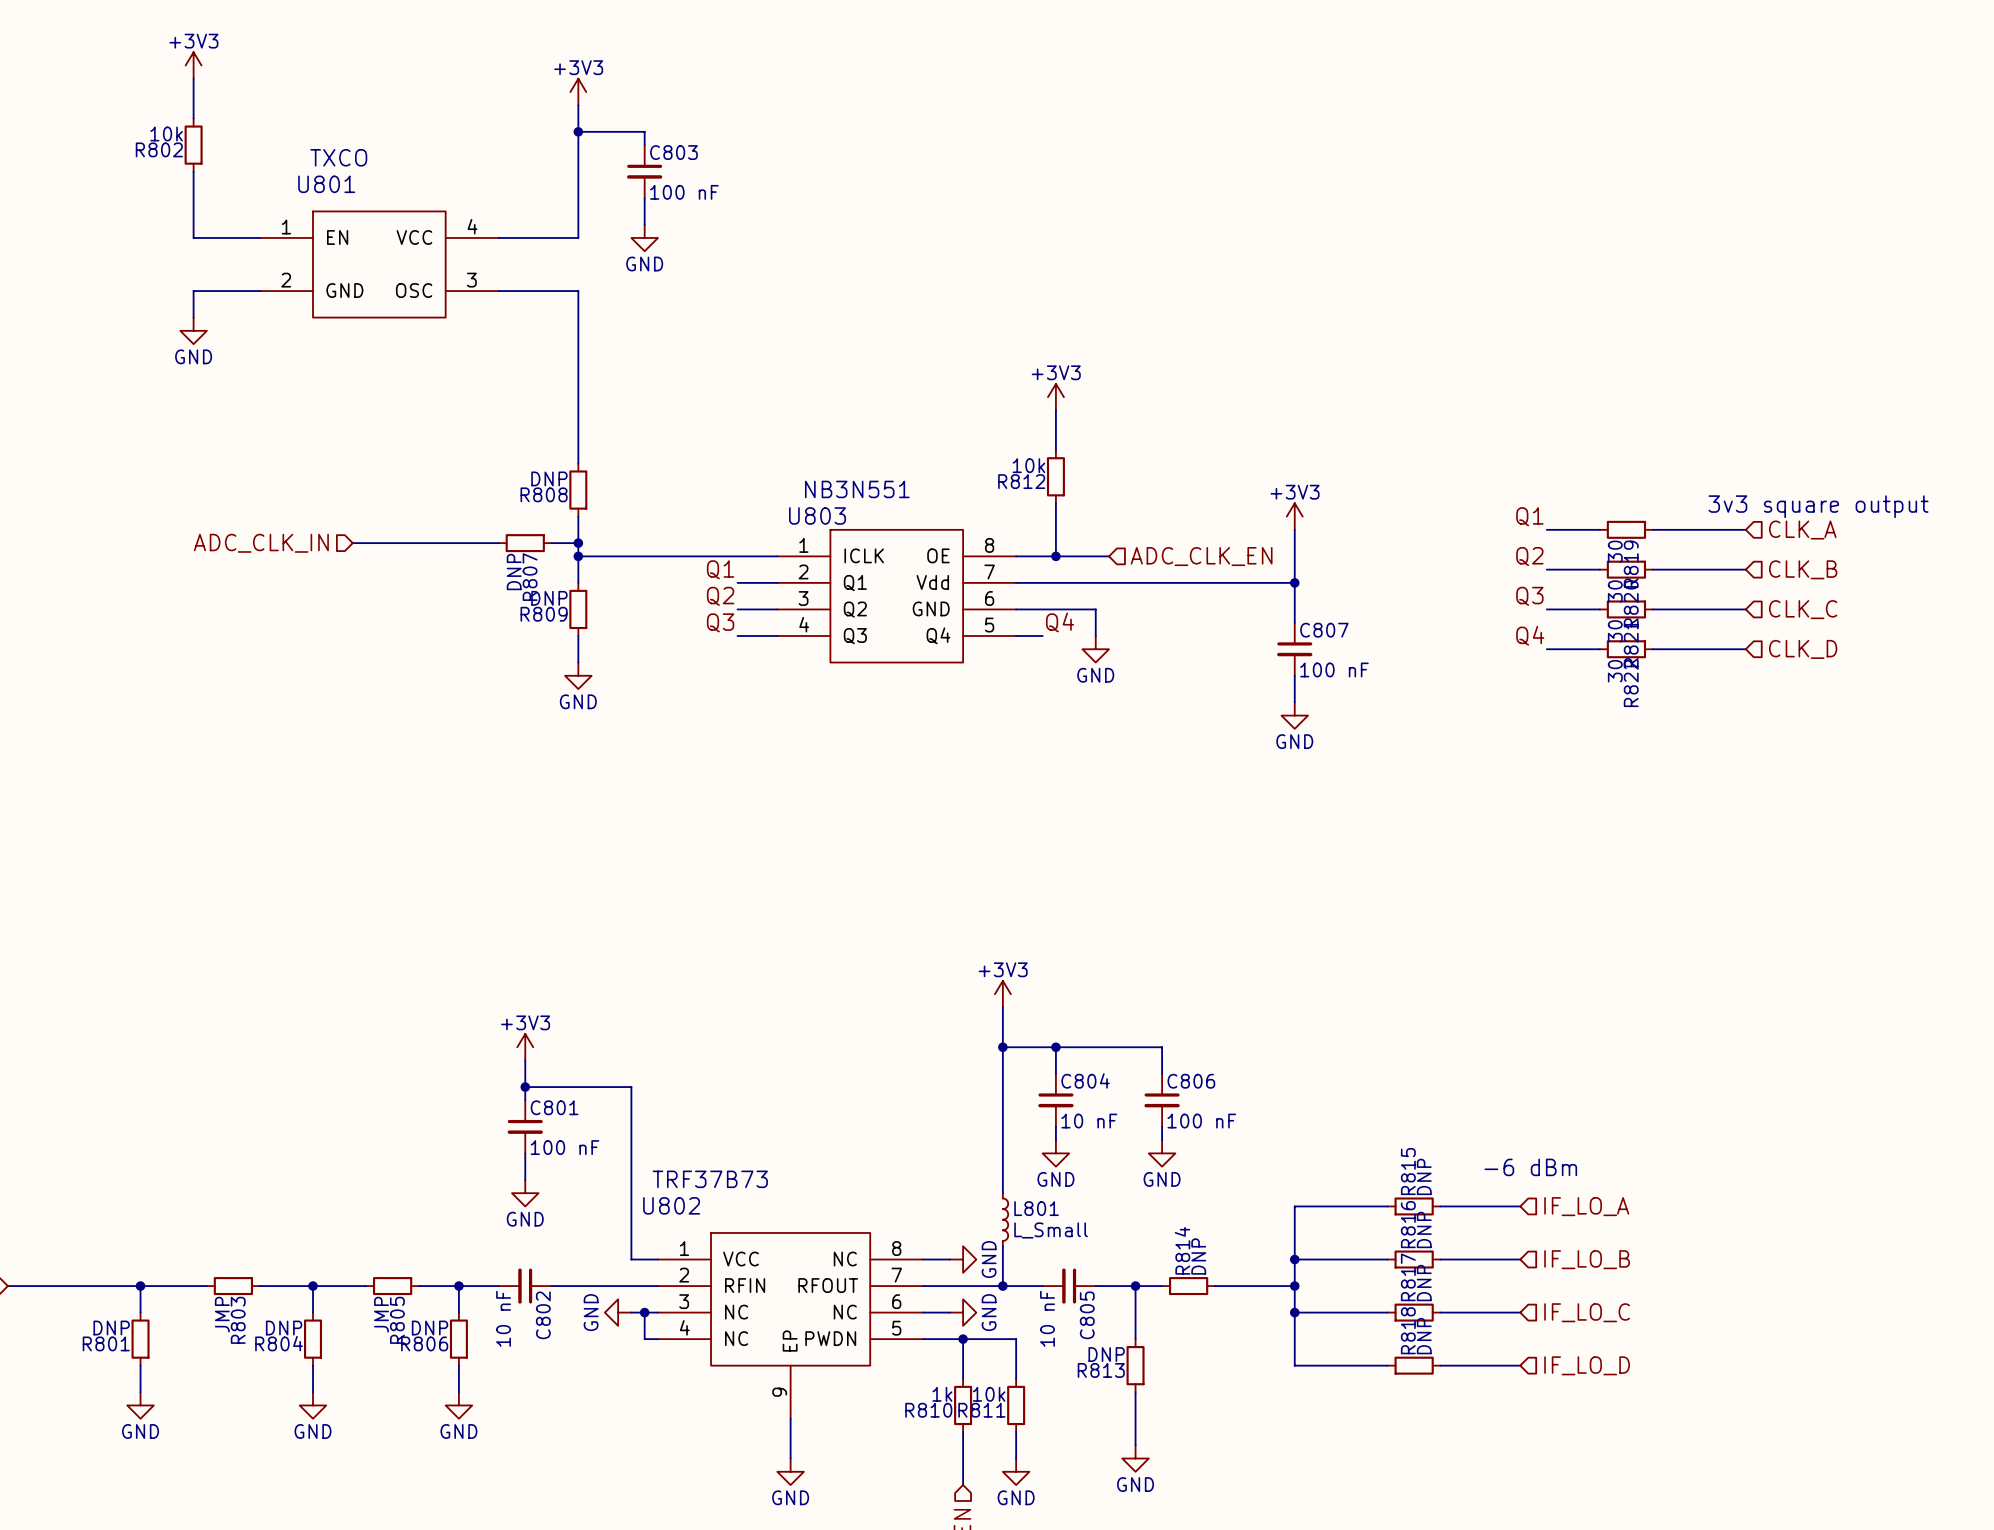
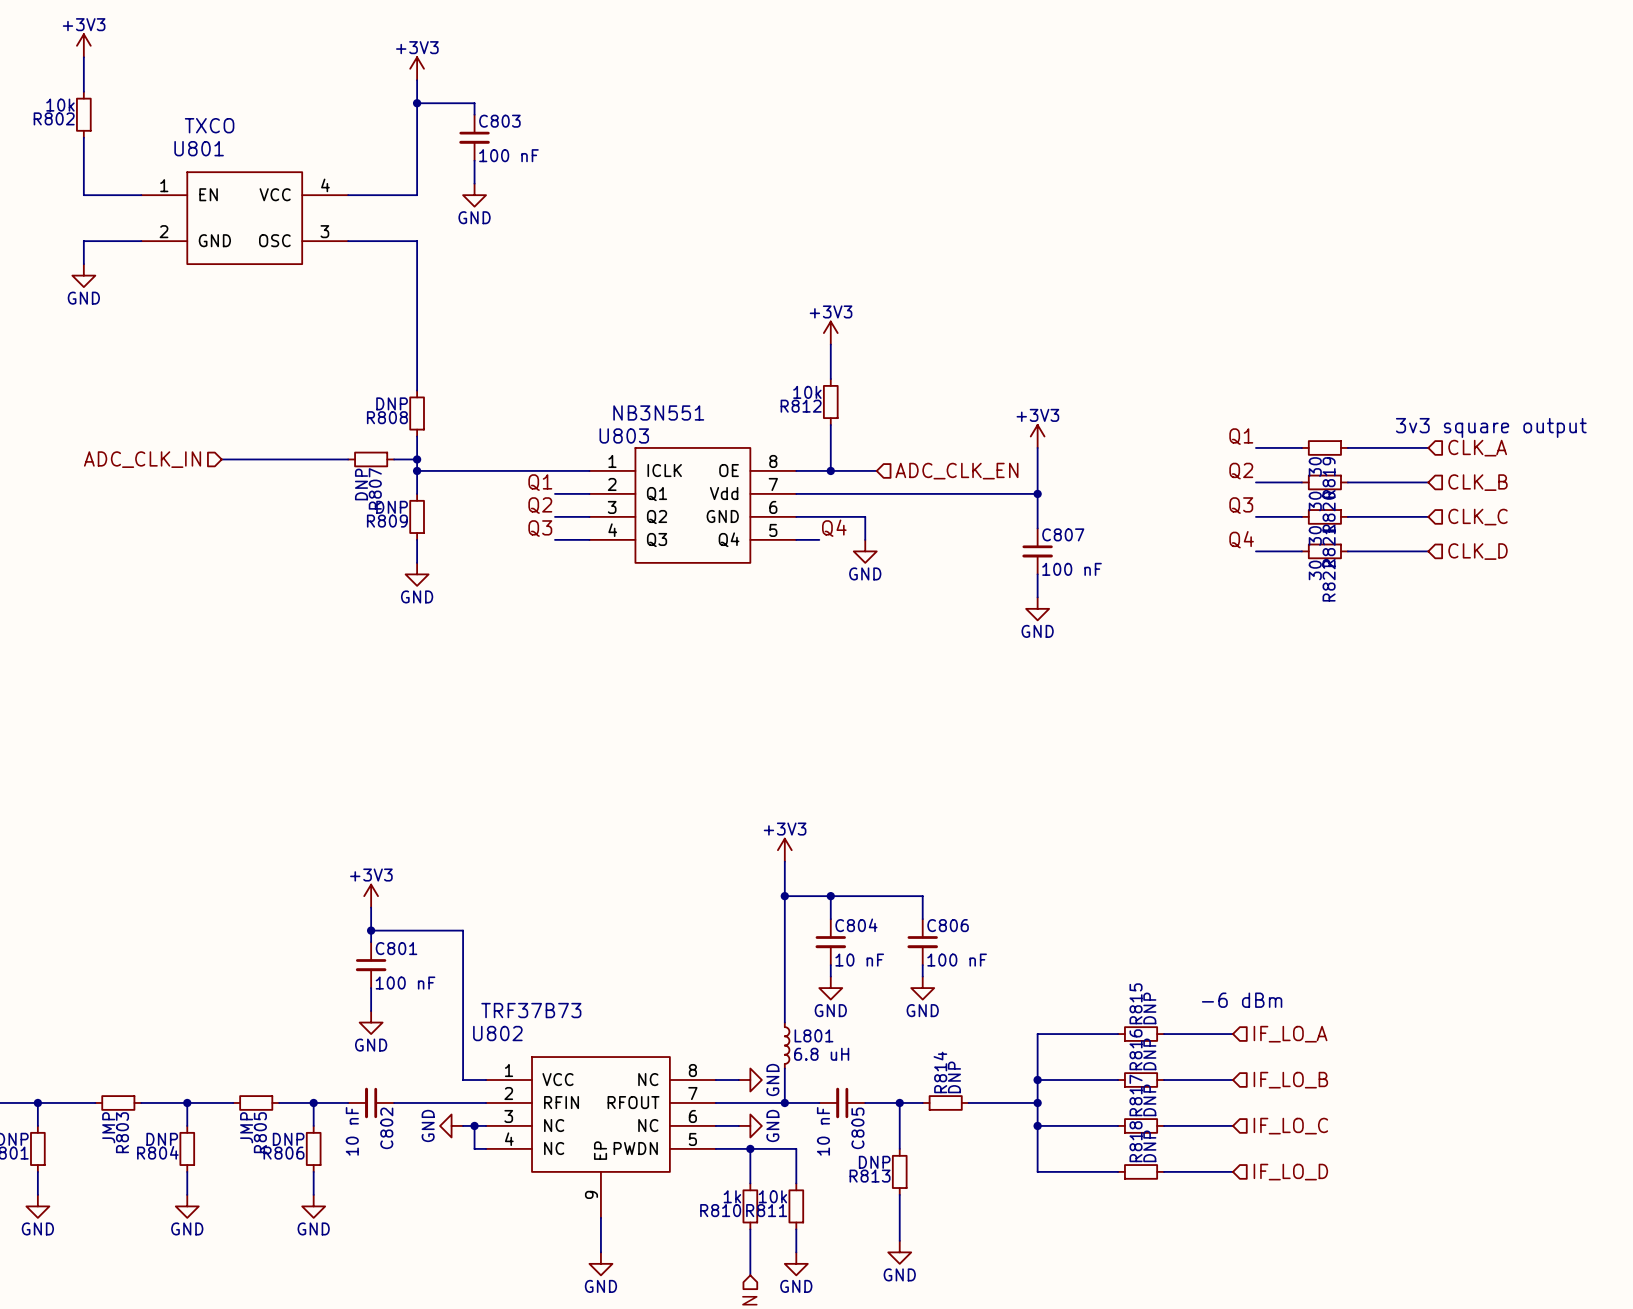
L801 value: L_Small (1051, 1230) -> 6.8 uH (821, 1054)

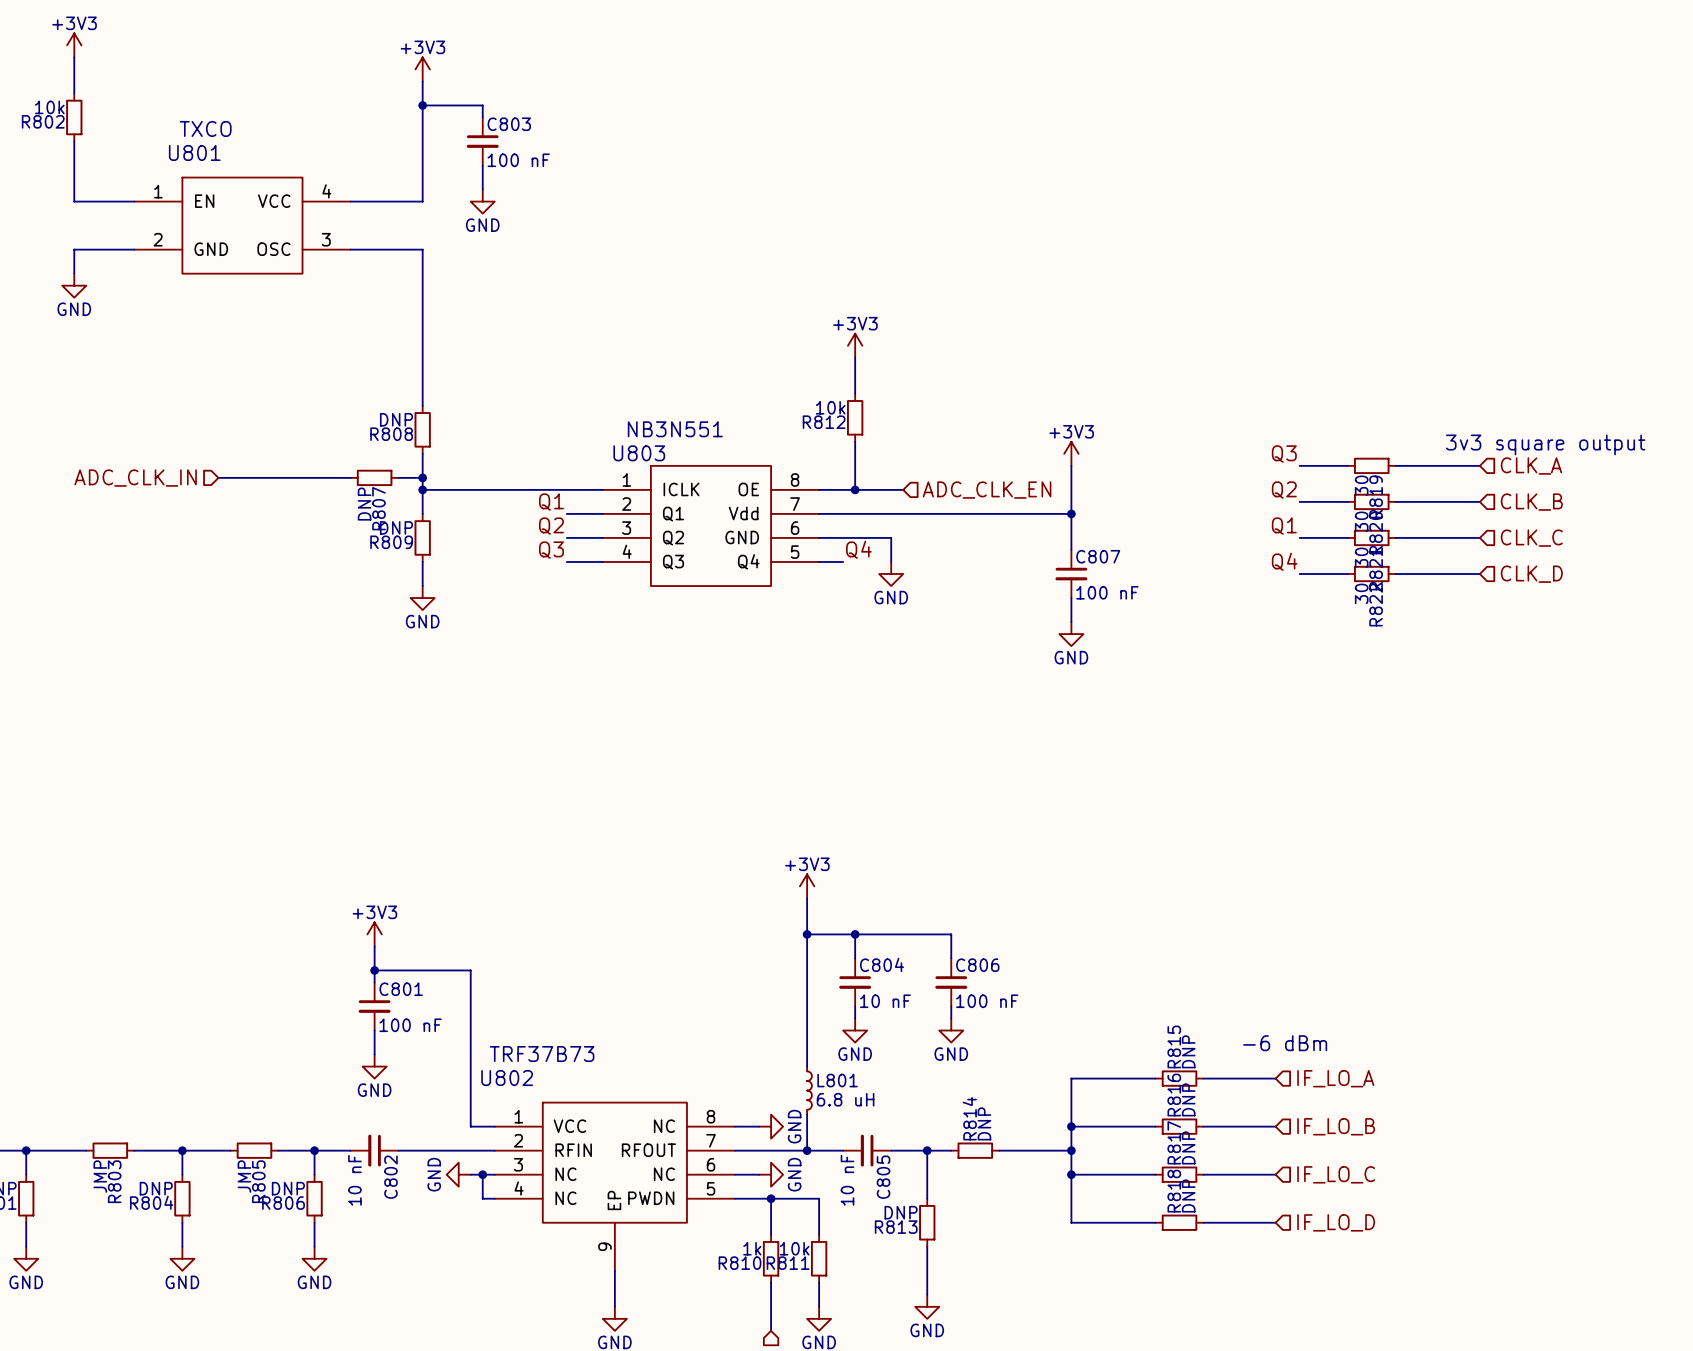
label: Q1 (1241, 436) -> Q3 (1284, 453)
label: Q3 (1241, 505) -> Q1 (1284, 526)

